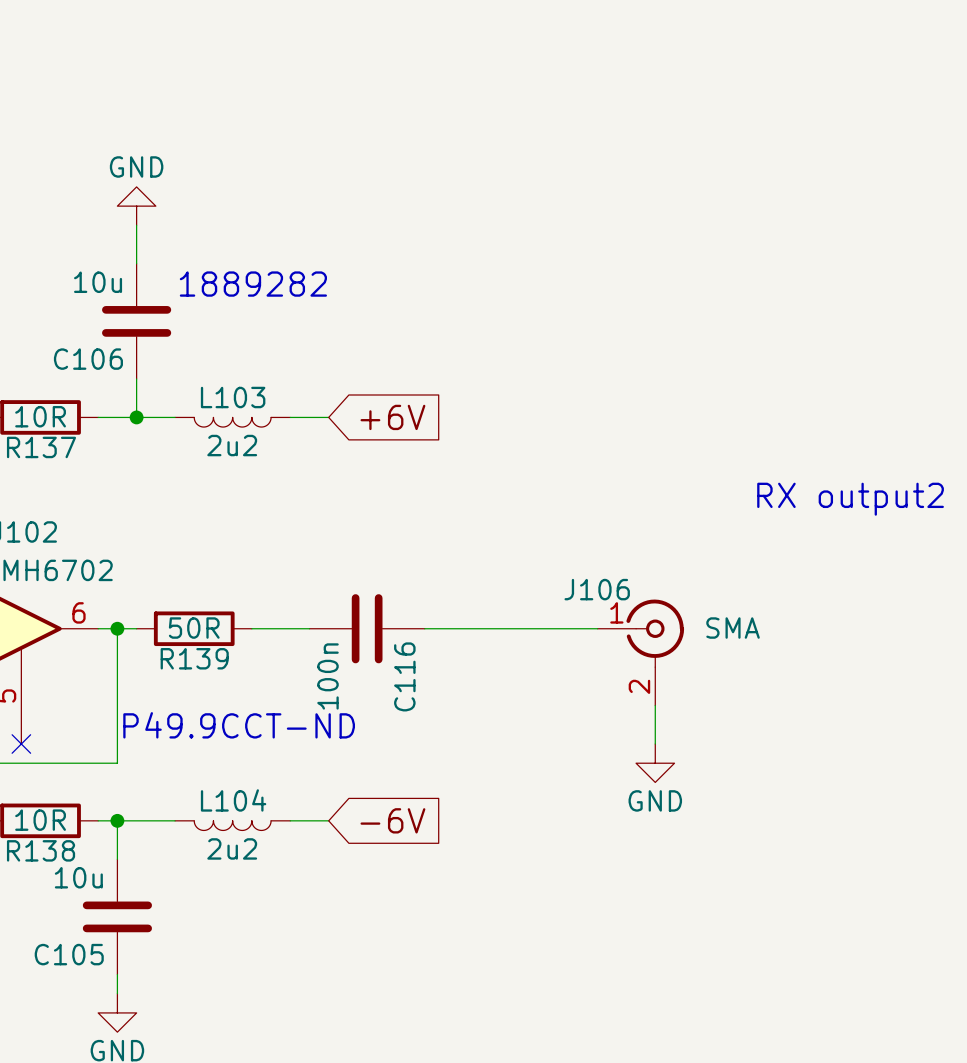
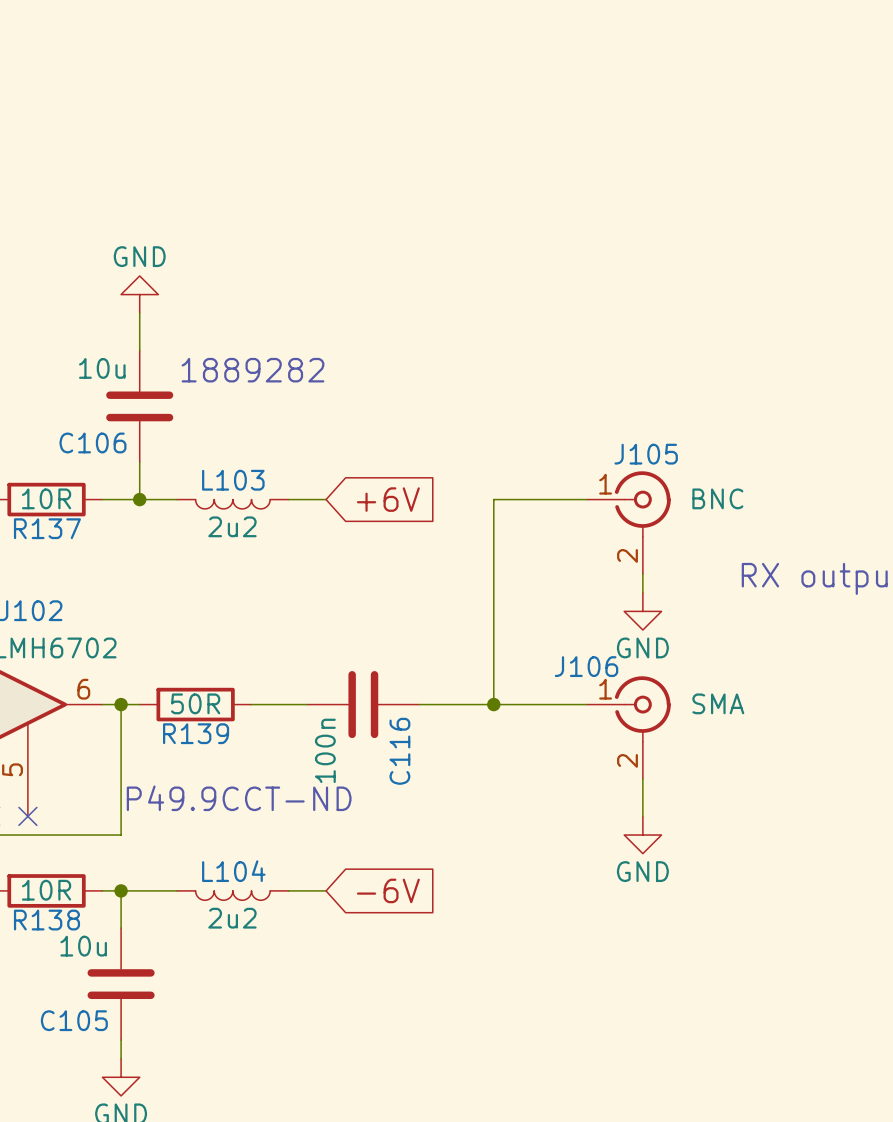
wire: none -> (586, 499) (493, 499) (493, 704)
J105: none -> BNC (628, 522)
wire: none -> (642, 574) (642, 592)
power symbol: none -> GND (642, 611)
junction: none -> (493, 704)

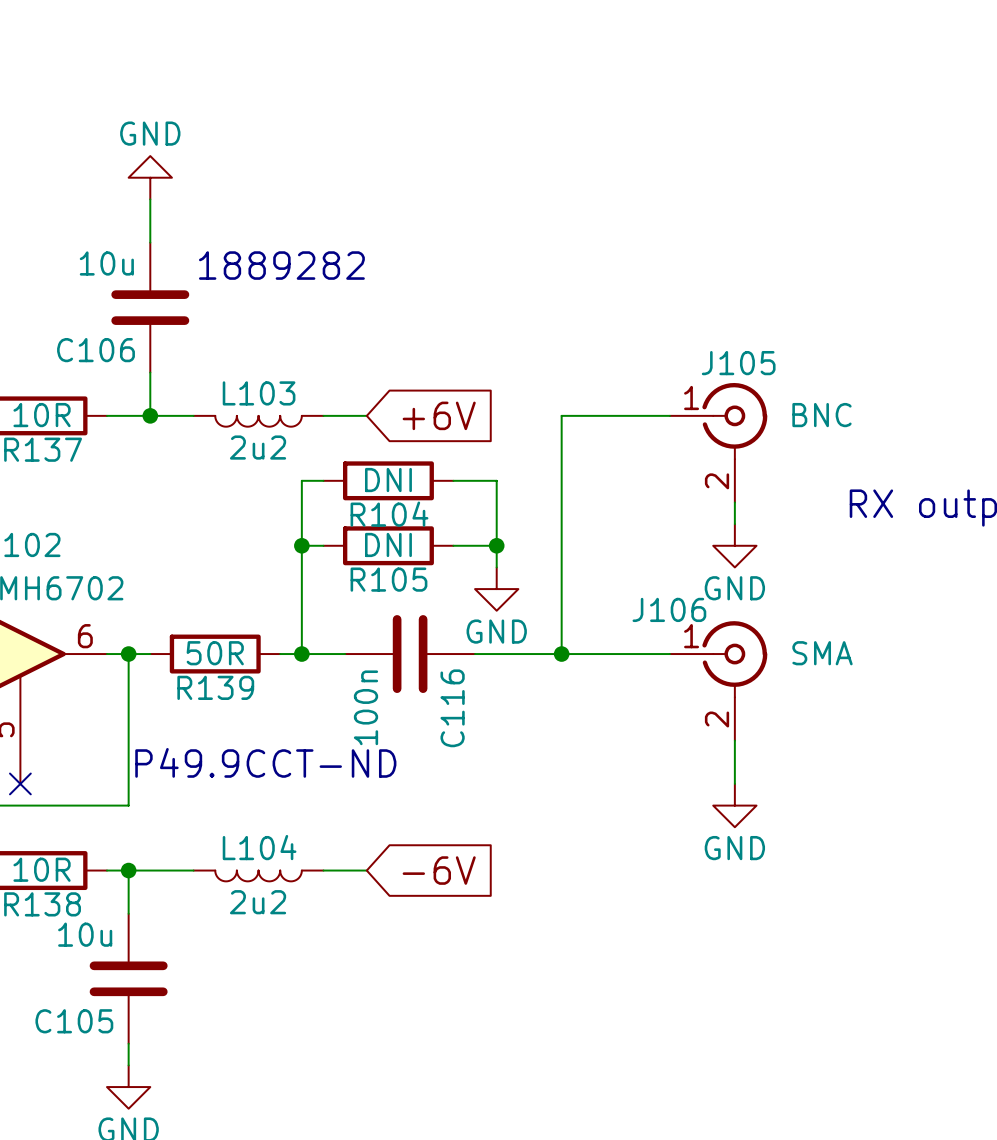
wire: none -> (323, 480) (301, 480) (301, 654)
R104: none -> DNI (388, 480)
wire: none -> (453, 480) (496, 480) (496, 567)
wire: none -> (301, 545) (323, 545)
junction: none -> (301, 545)
R105: none -> DNI (388, 545)
wire: none -> (453, 545) (496, 545)
junction: none -> (496, 545)
power symbol: none -> GND (496, 589)
junction: none -> (301, 654)

